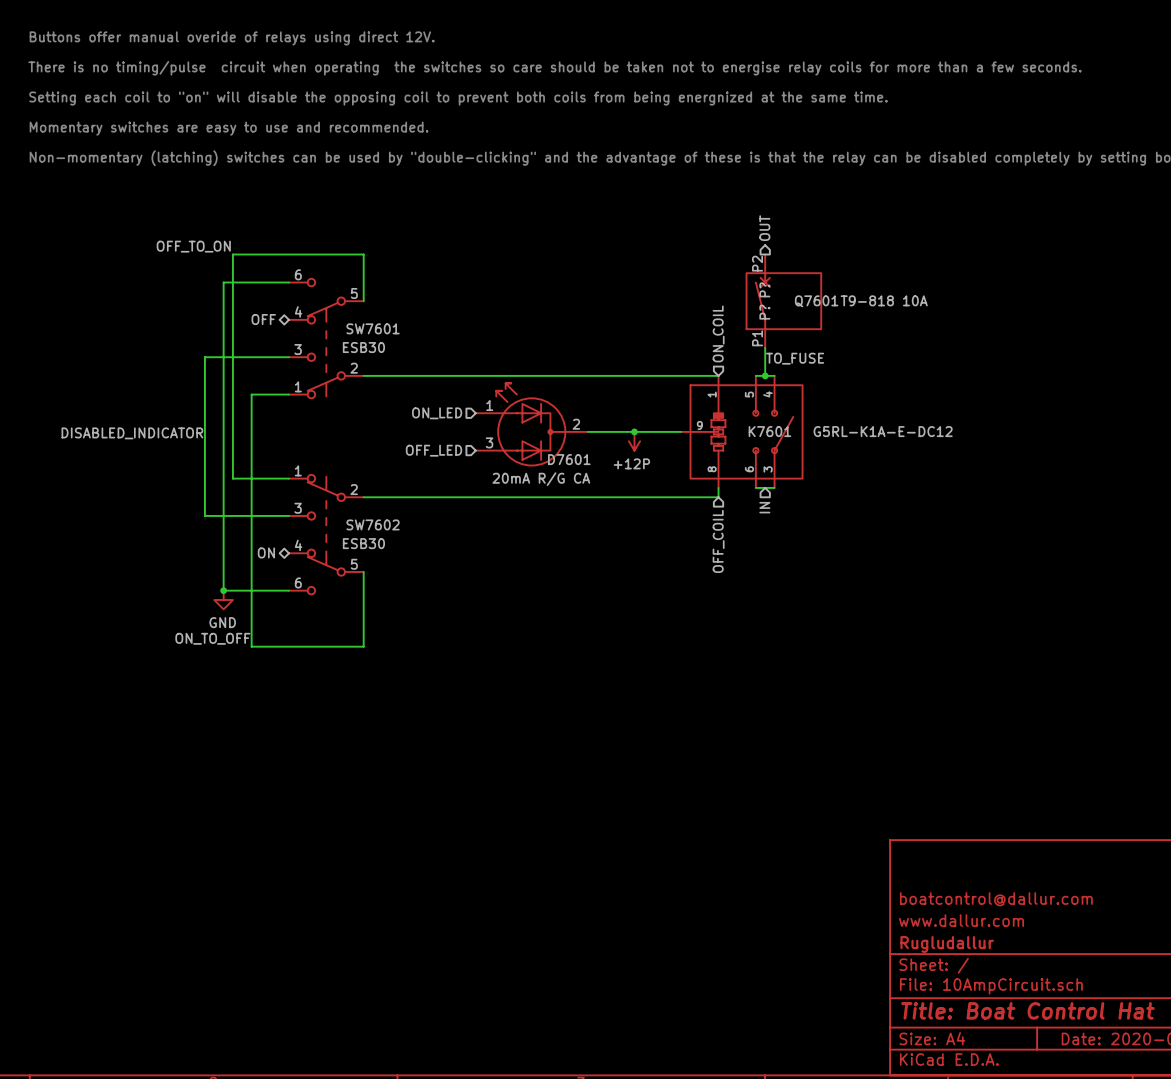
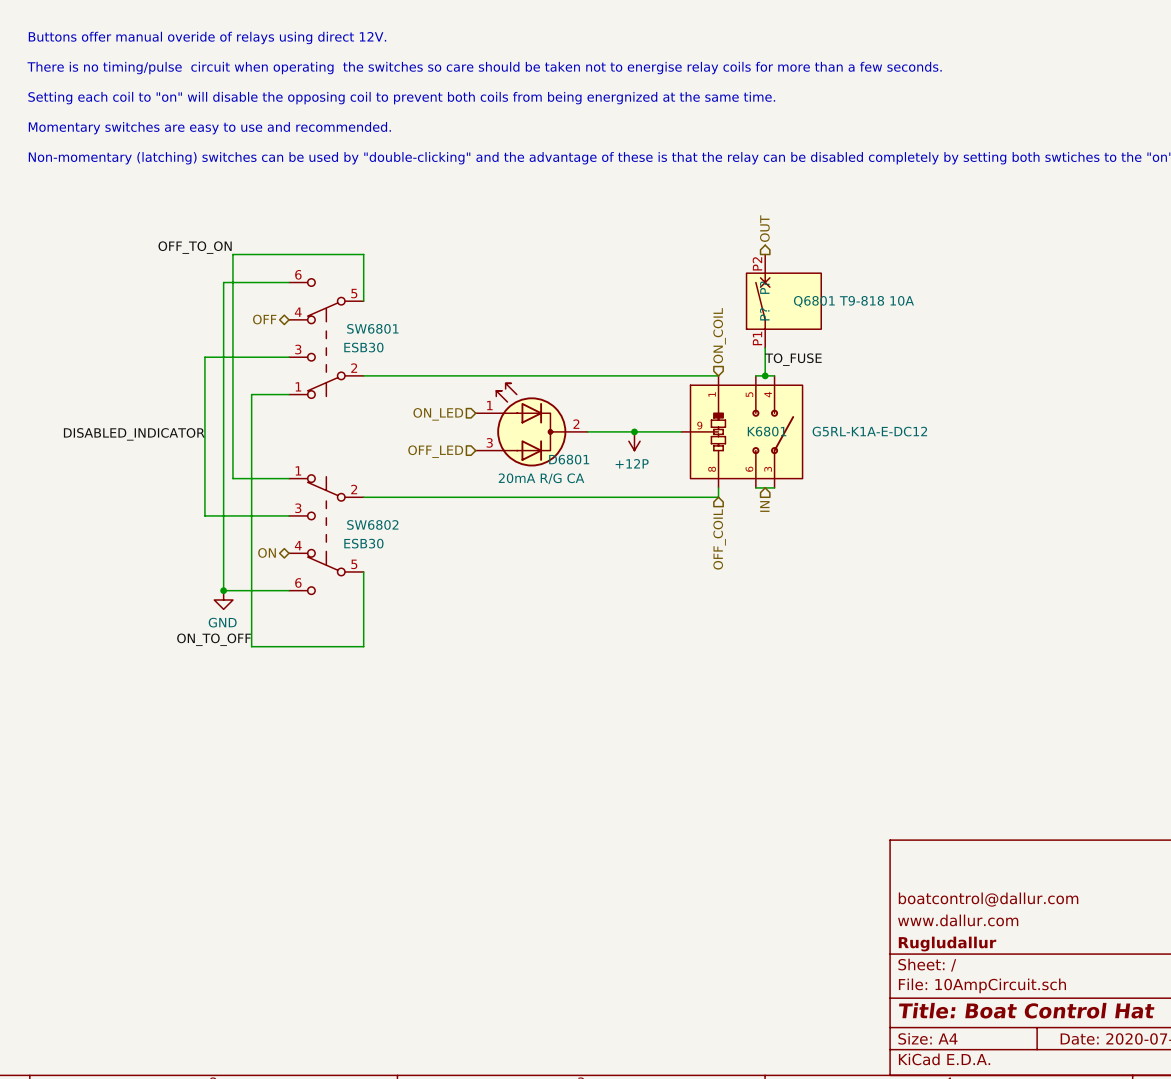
Q7601 name: Q7601 (816, 301) -> Q6801 (814, 301)
SW7601 name: SW7601 (373, 328) -> SW6801 (372, 328)
K7601 name: K7601 (769, 431) -> K6801 (767, 431)
D7601 name: D7601 (569, 459) -> D6801 (569, 459)
SW7602 name: SW7602 (373, 524) -> SW6802 (372, 524)

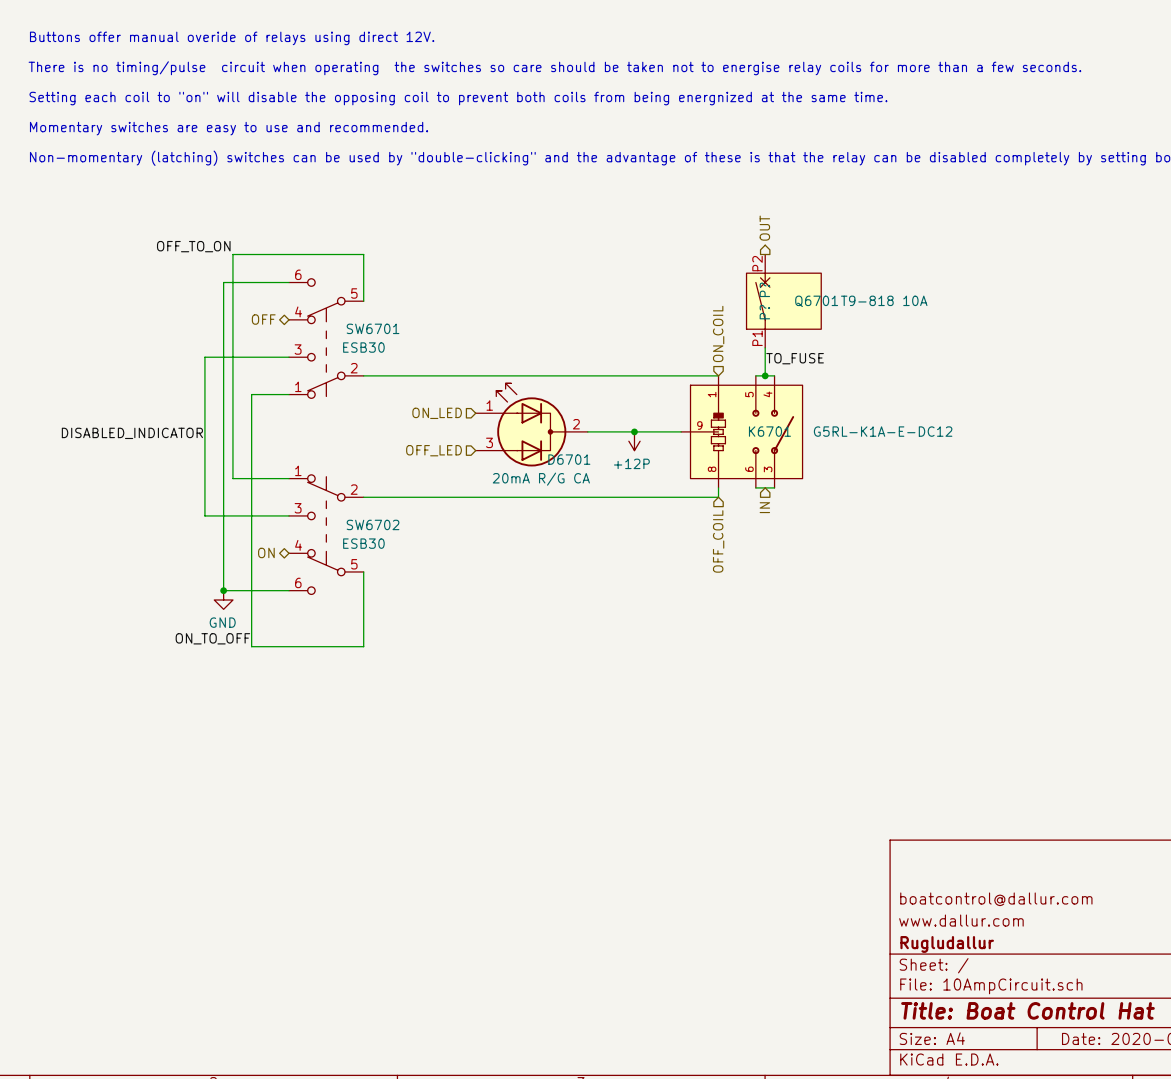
Q6801 name: Q6801 (814, 301) -> Q6701 (816, 301)
SW6801 name: SW6801 (372, 328) -> SW6701 (373, 328)
K6801 name: K6801 (767, 431) -> K6701 (769, 431)
D6801 name: D6801 (569, 459) -> D6701 (569, 459)
SW6802 name: SW6802 (372, 524) -> SW6702 (373, 524)

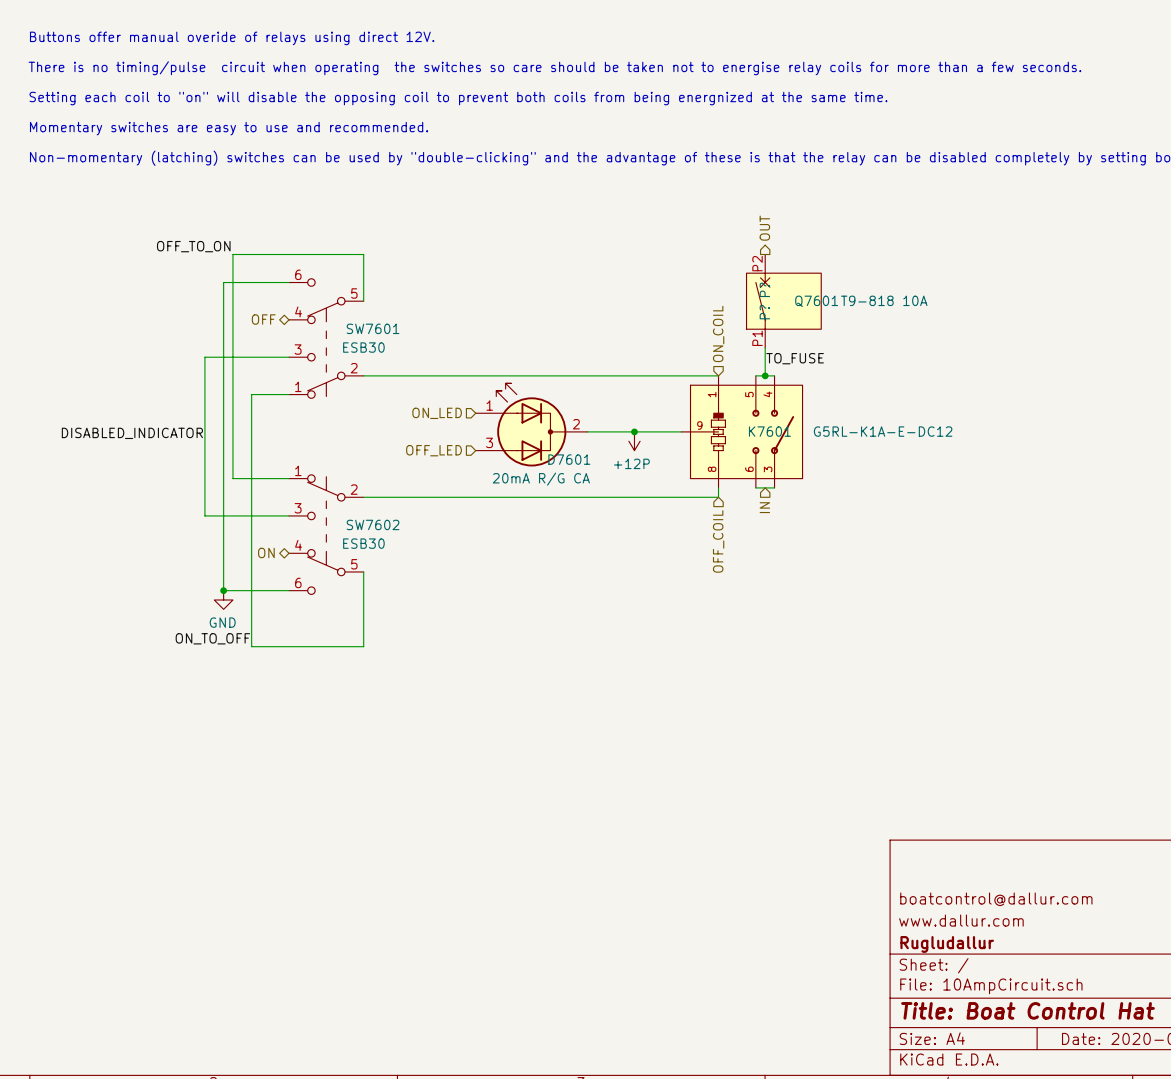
Q6701 name: Q6701 (816, 301) -> Q7601 (816, 301)
SW6701 name: SW6701 (373, 328) -> SW7601 (373, 328)
K6701 name: K6701 (769, 431) -> K7601 (769, 431)
D6701 name: D6701 (569, 459) -> D7601 (569, 459)
SW6702 name: SW6702 (373, 524) -> SW7602 (373, 524)

